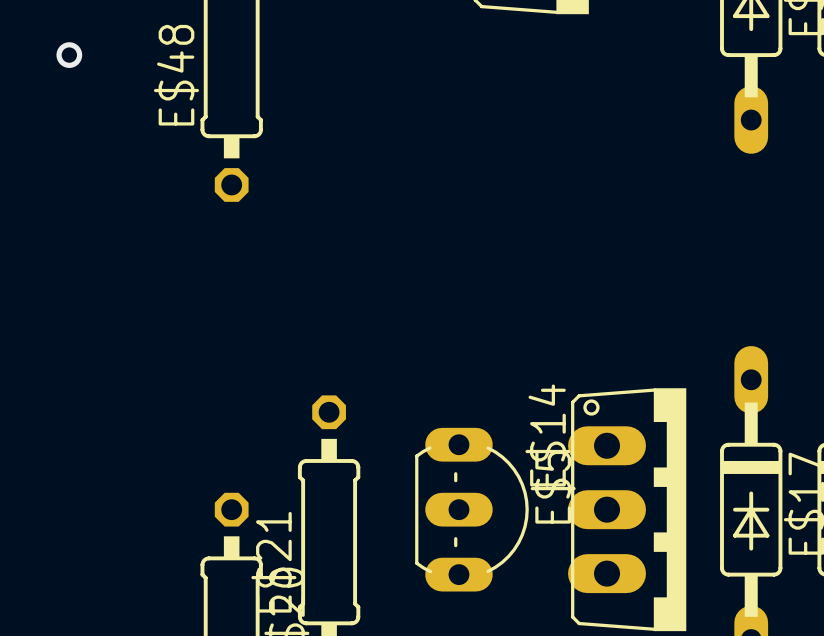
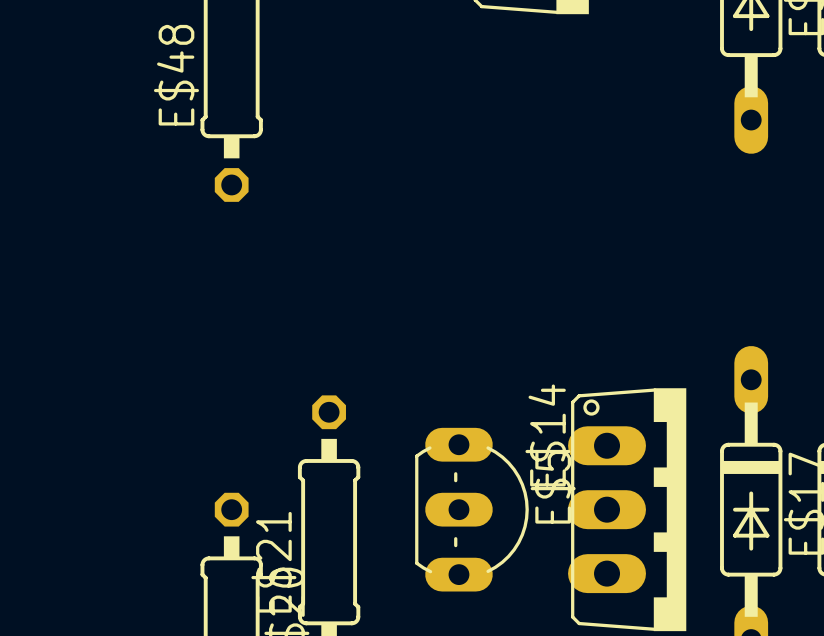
via: (69, 55) -> none

